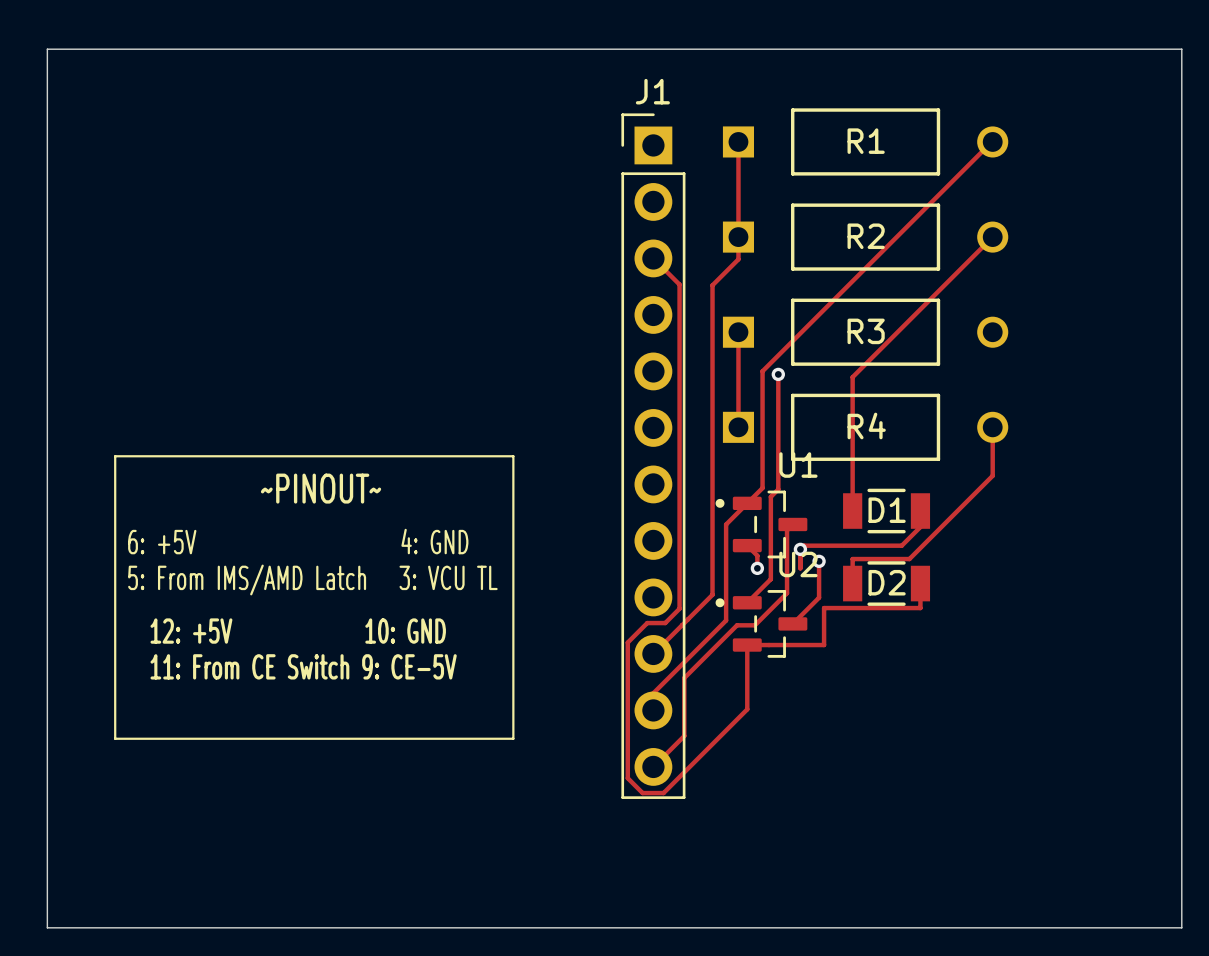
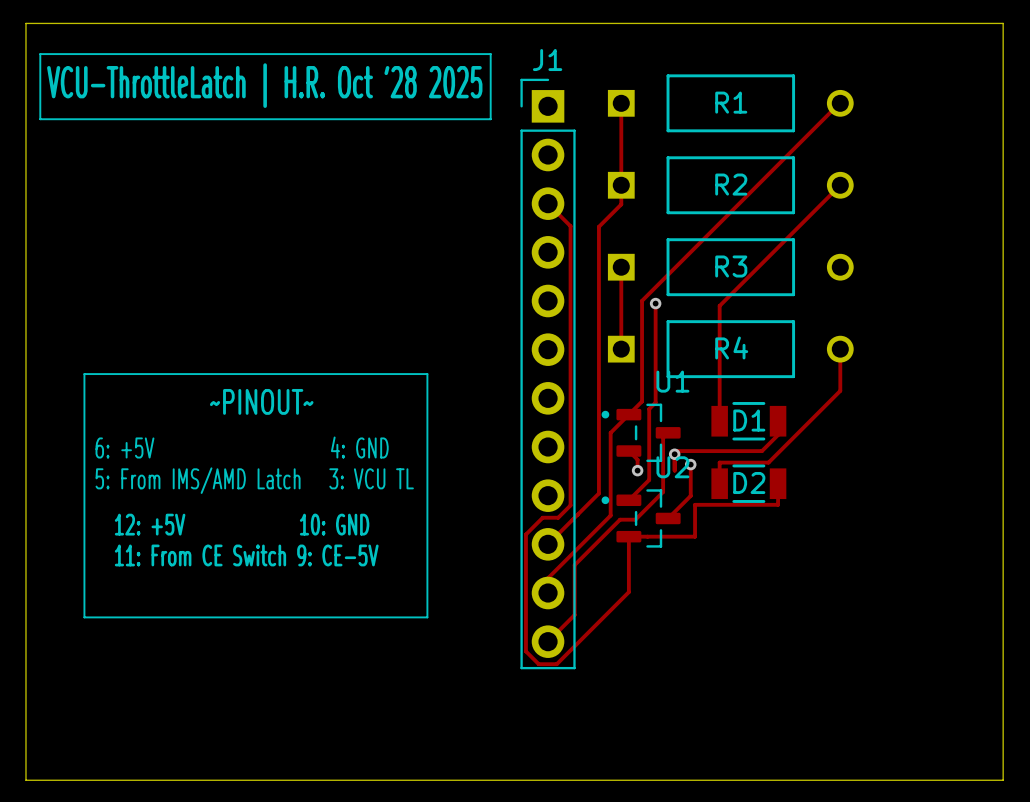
line: none -> (40, 54) (490, 54) (490, 119) (40, 119) (40, 54)
text: none -> VCU-ThrottleLatch | H.R. Oct '28 2025 (264, 85)

